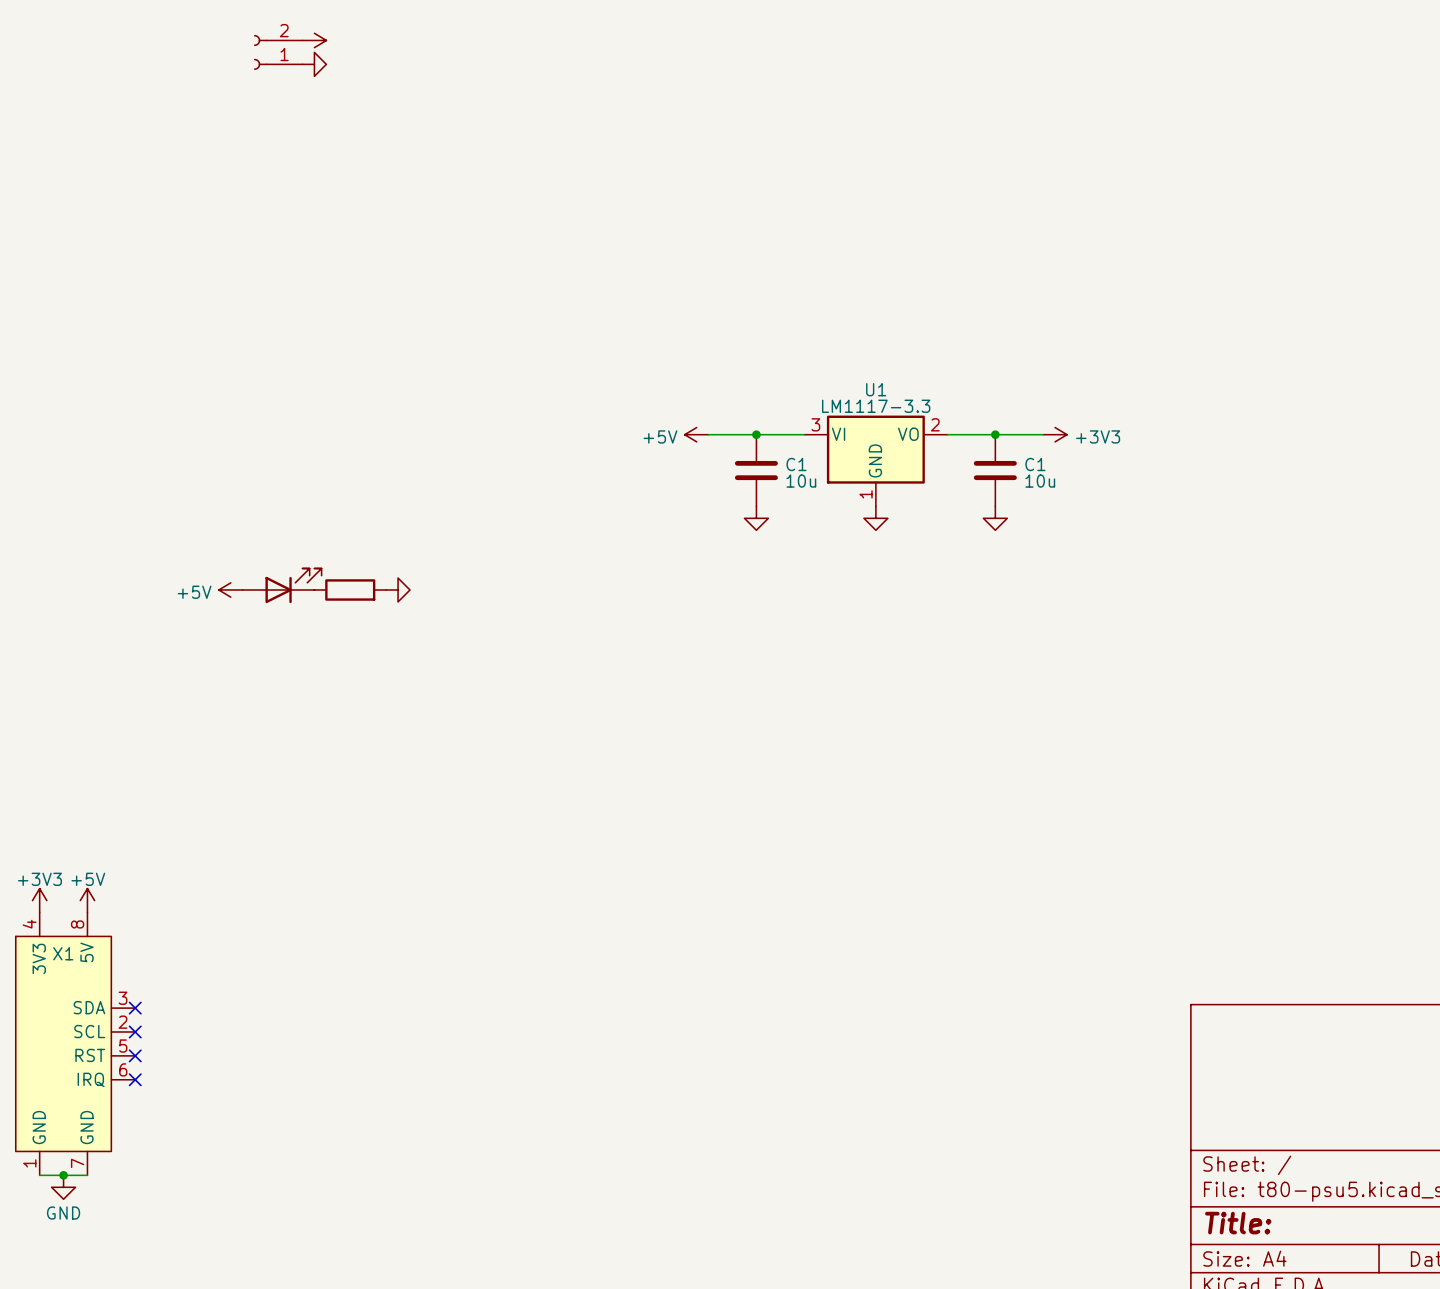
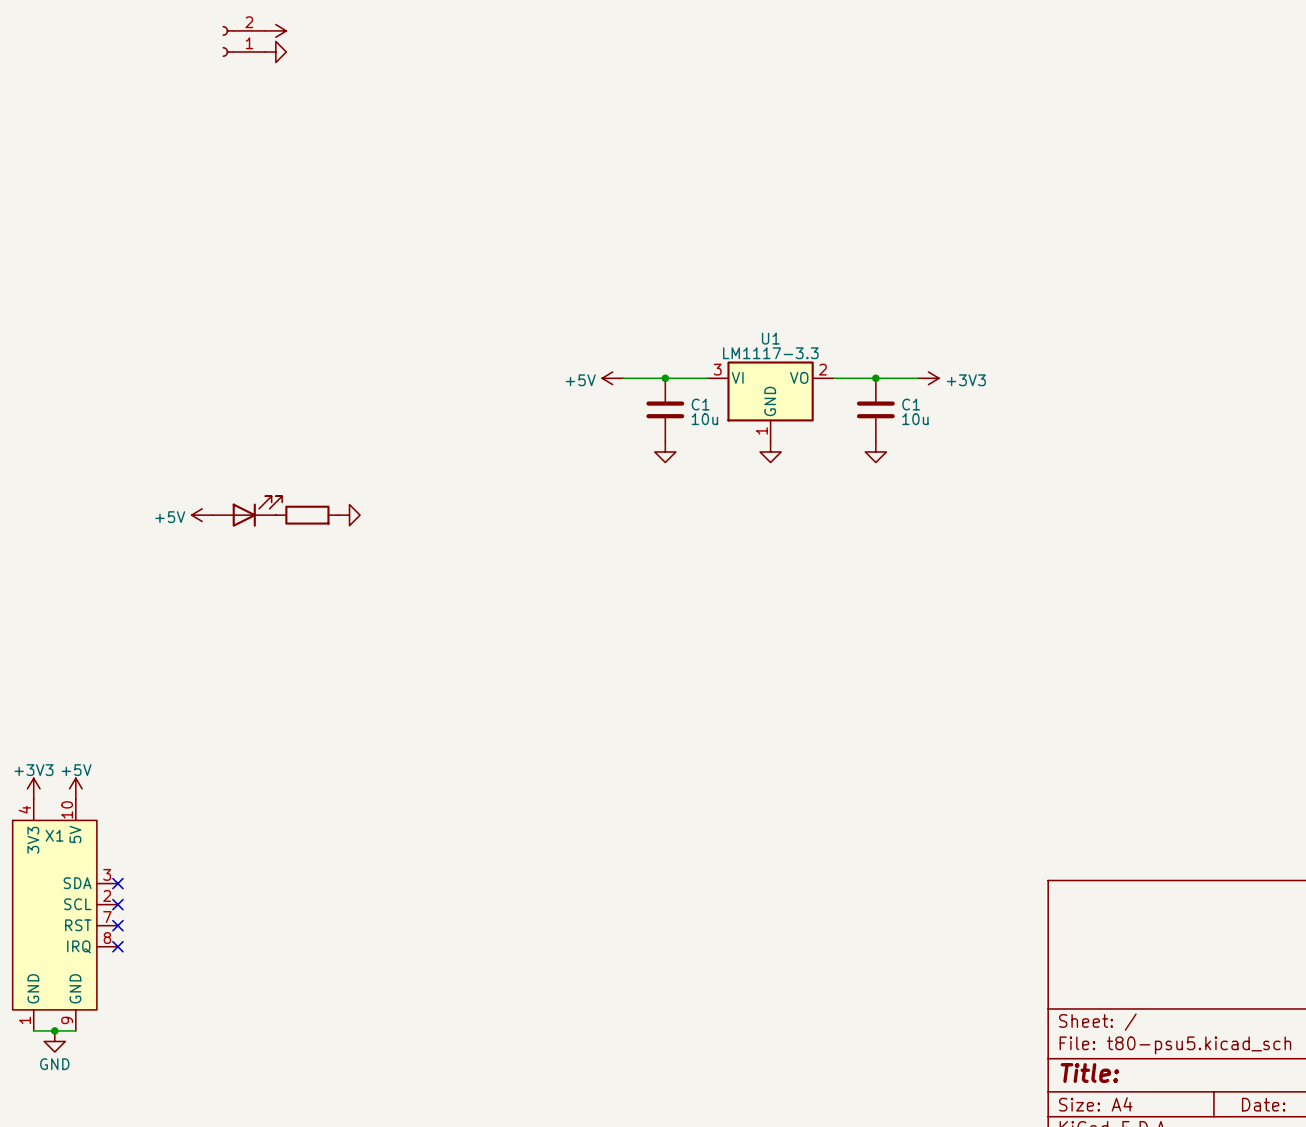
X1 pin number: 8 (77, 924) -> 10 (67, 809)
X1 pin number: 5 (123, 1046) -> 7 (107, 917)
X1 pin number: 6 (123, 1069) -> 8 (107, 938)
X1 pin number: 7 (77, 1163) -> 9 (67, 1020)

